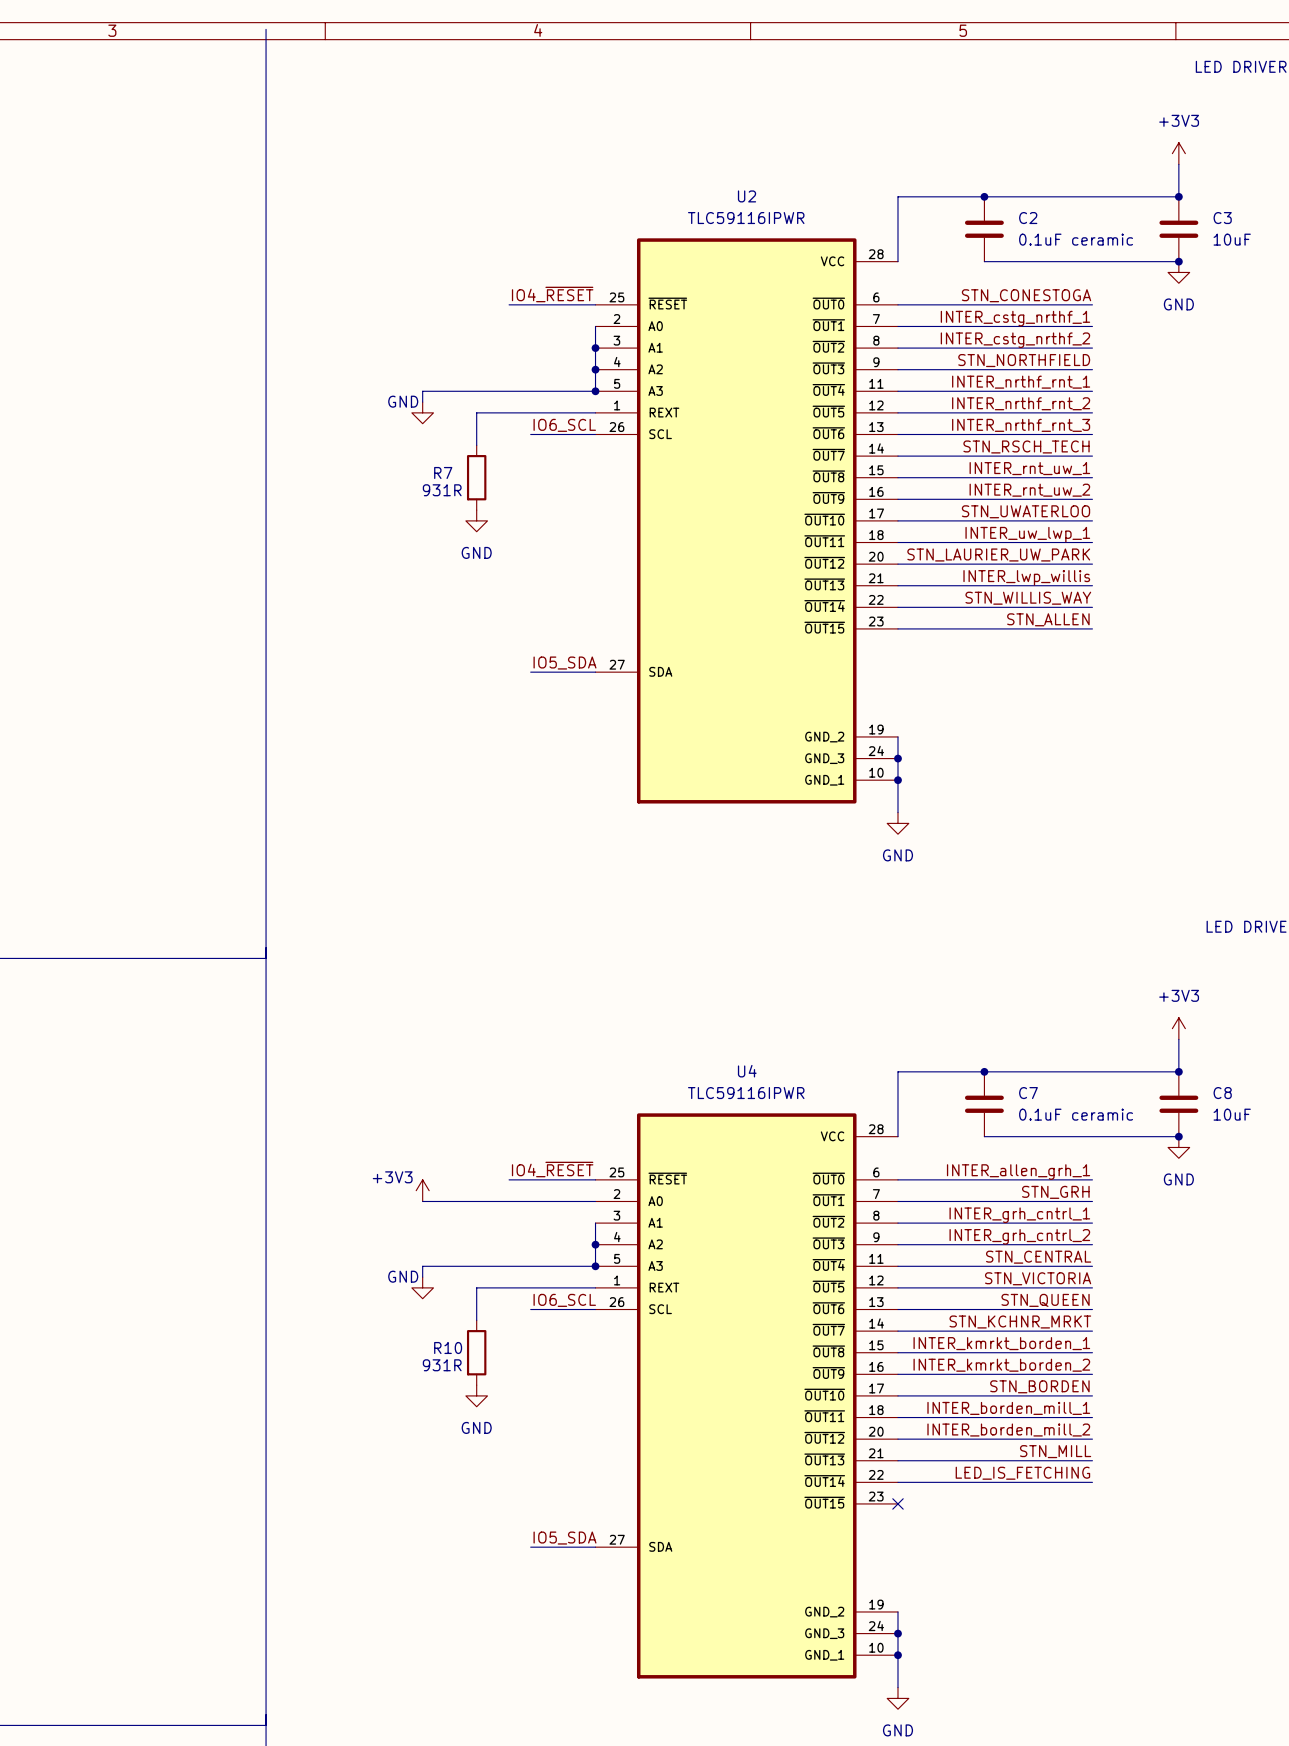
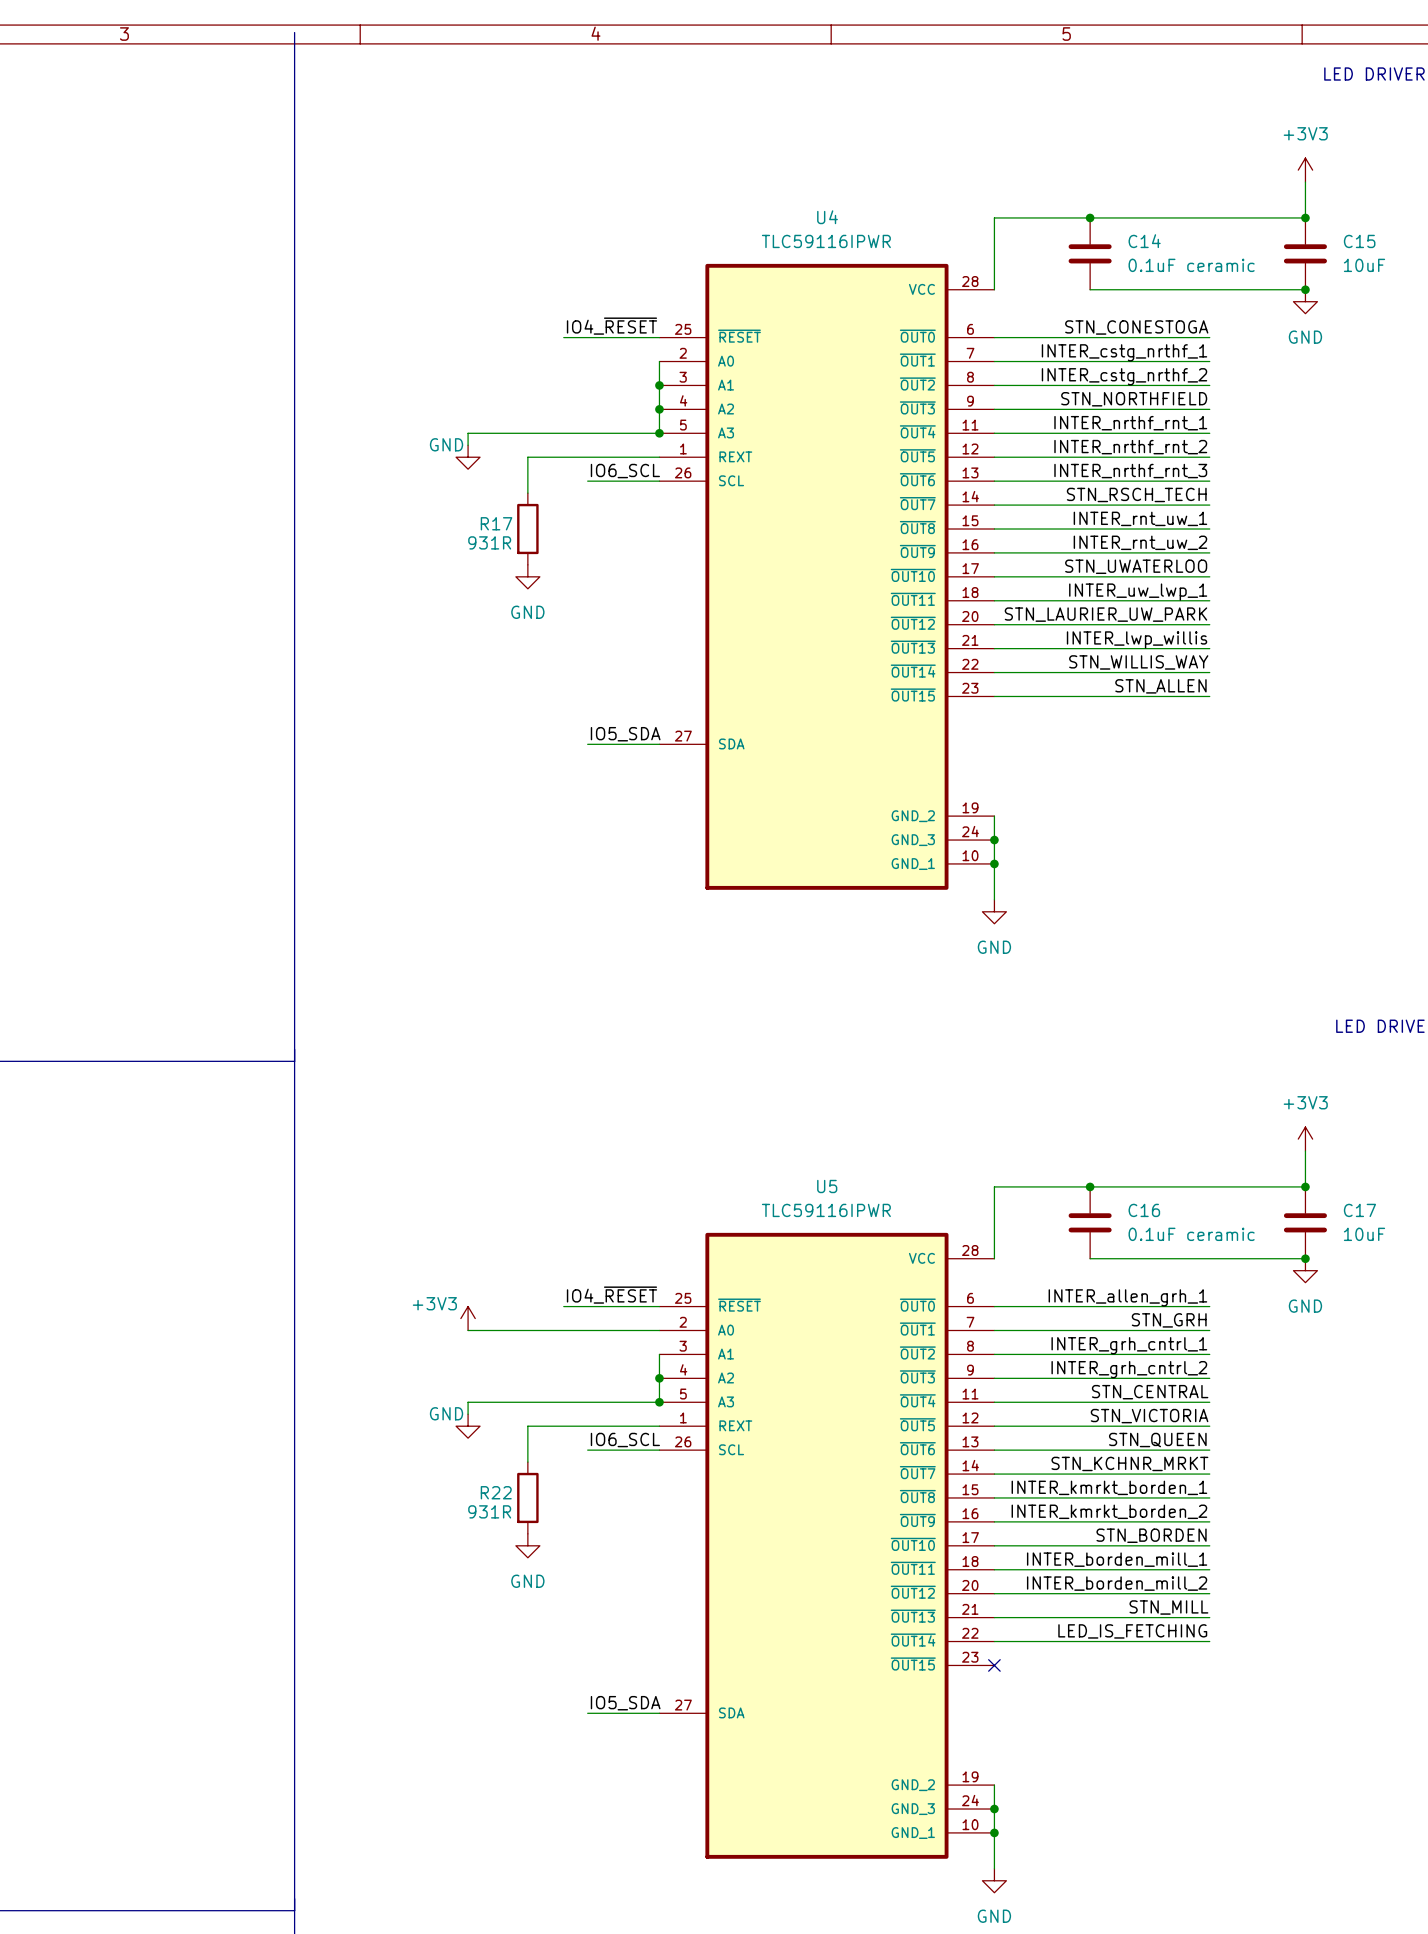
U2 name: U2 (747, 196) -> U4 (827, 217)
C2 name: C2 (1028, 218) -> C14 (1144, 241)
C3 name: C3 (1222, 218) -> C15 (1359, 241)
R7 name: R7 (443, 472) -> R17 (496, 523)
U4 name: U4 (747, 1071) -> U5 (827, 1186)
C7 name: C7 (1028, 1093) -> C16 (1144, 1210)
C8 name: C8 (1222, 1093) -> C17 (1359, 1210)
R10 name: R10 (448, 1348) -> R22 (496, 1492)

